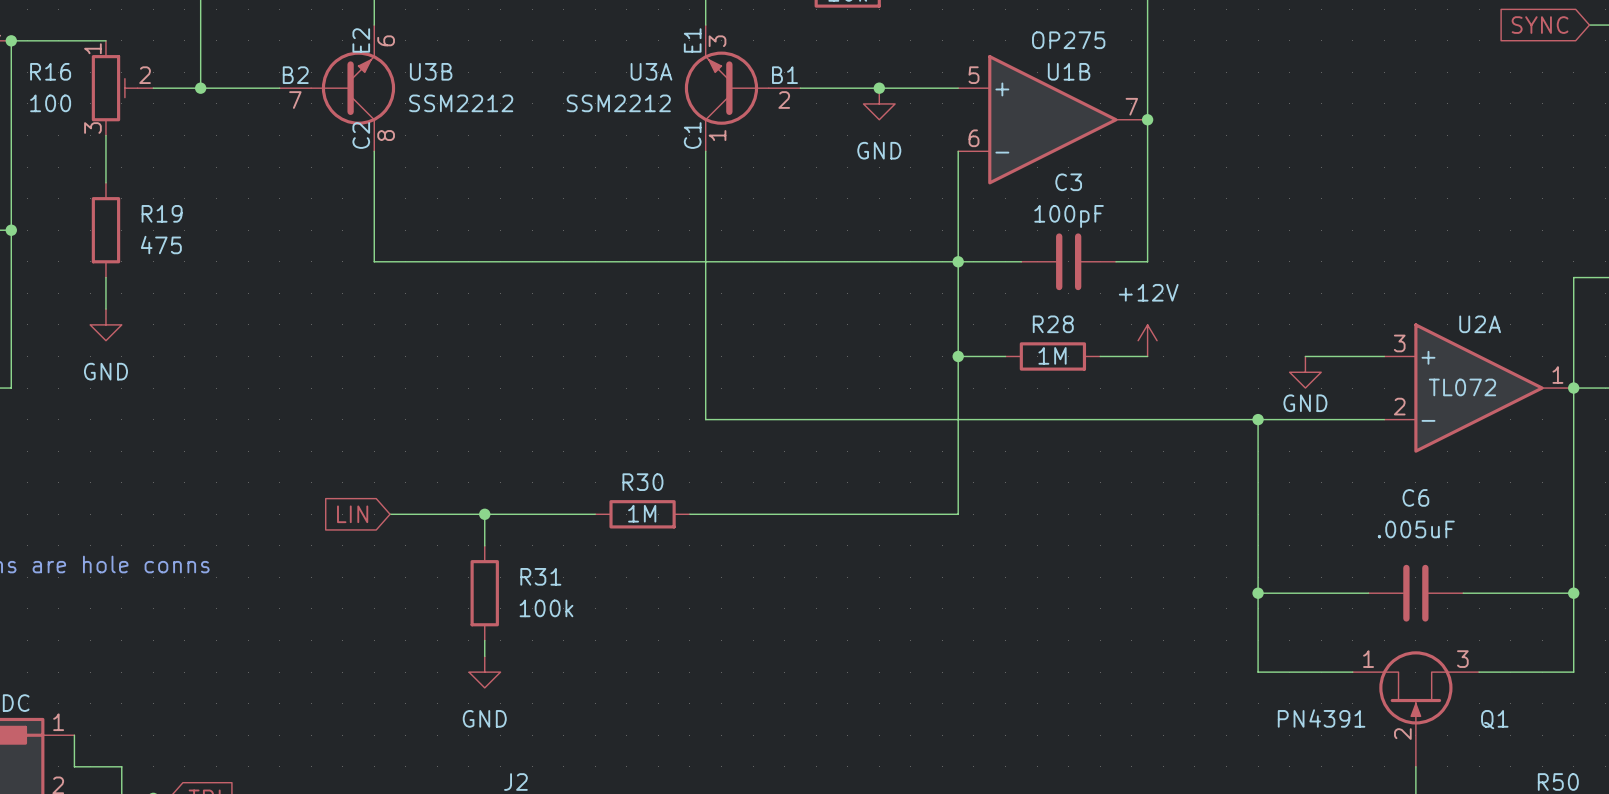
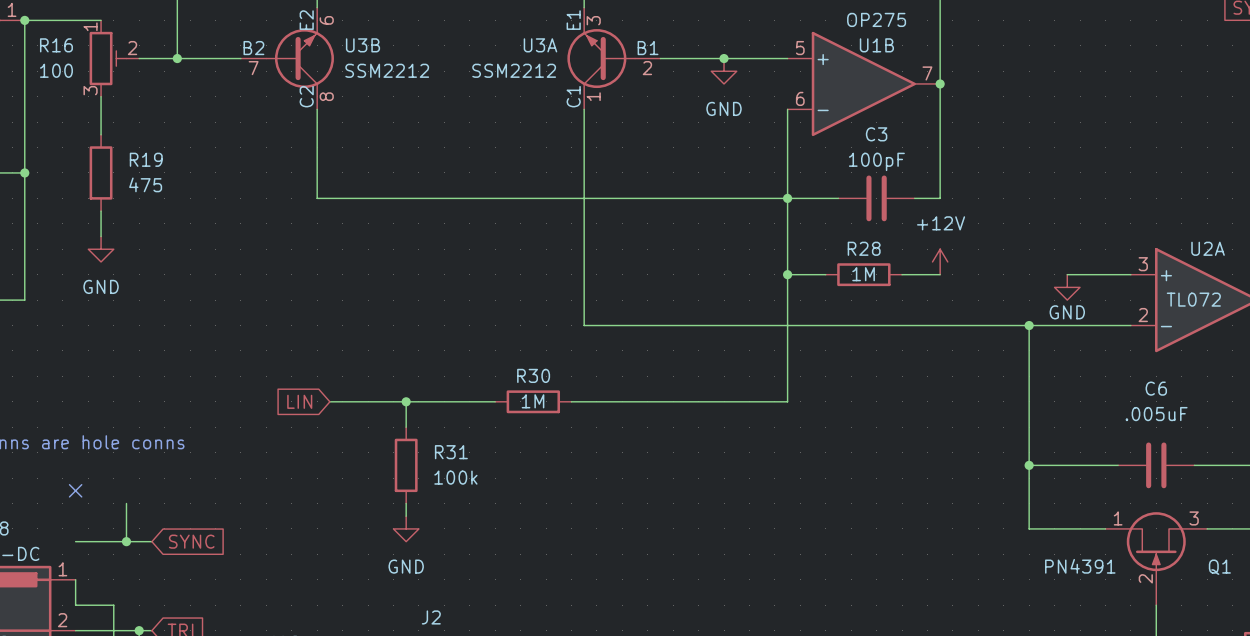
no-connect mark: none -> (75, 490)
wire: none -> (126, 503) (126, 541)
wire: none -> (75, 541) (151, 541)
junction: none -> (126, 541)
global label: none -> SYNC (191, 541)

